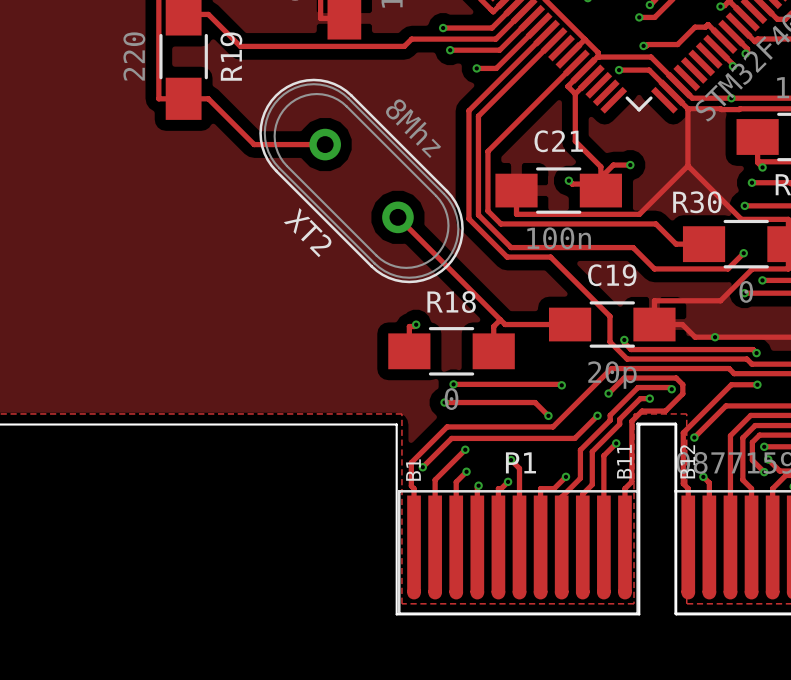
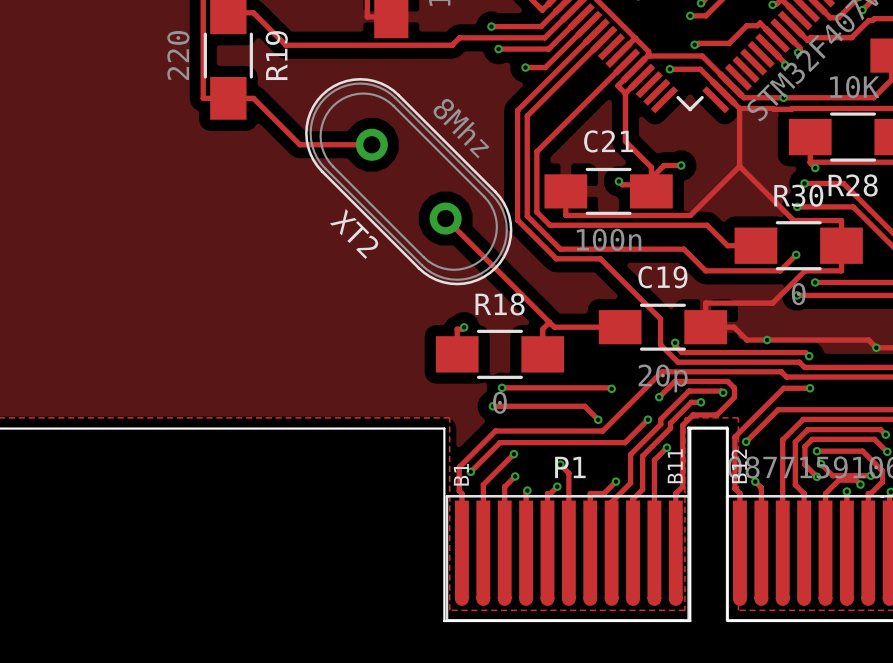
R30 name position: R30 (697, 202) -> R30 (798, 195)

